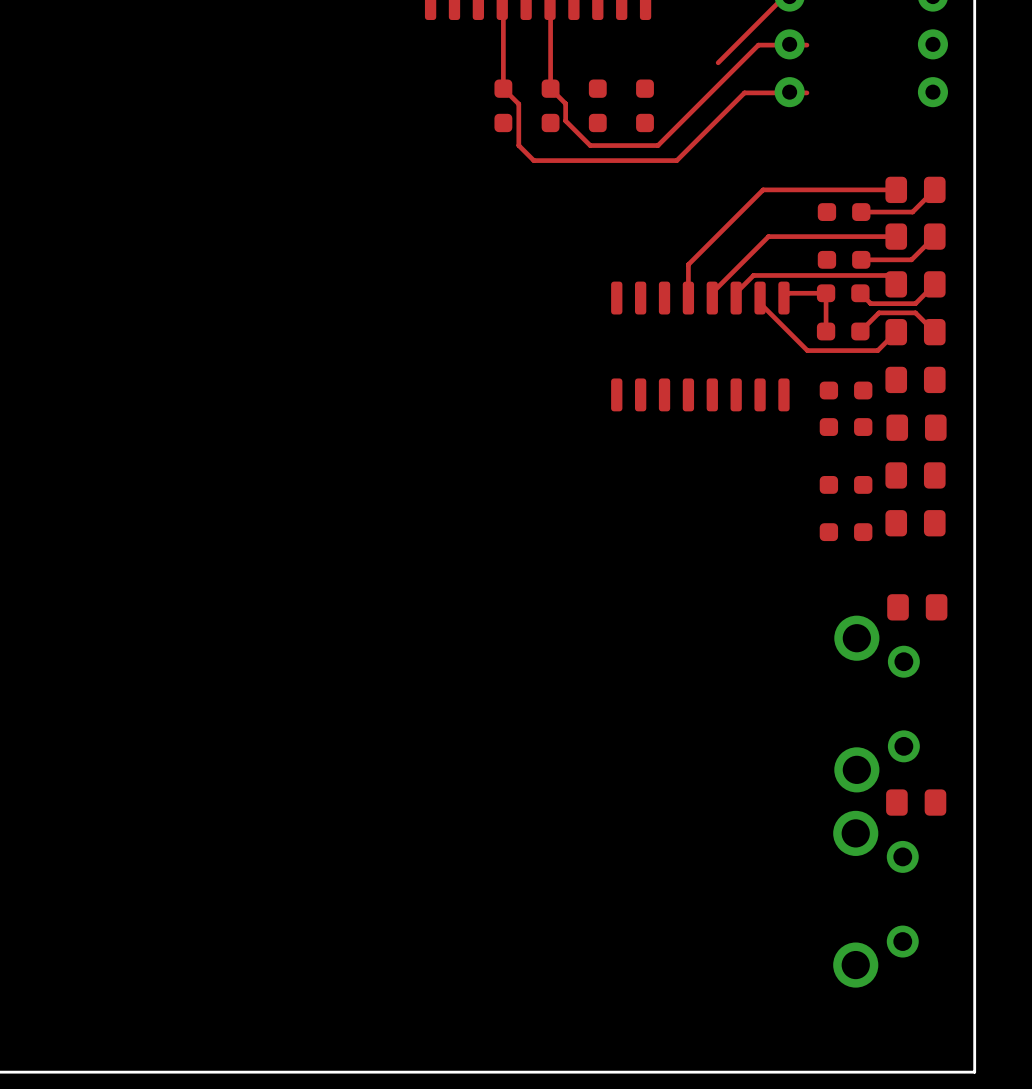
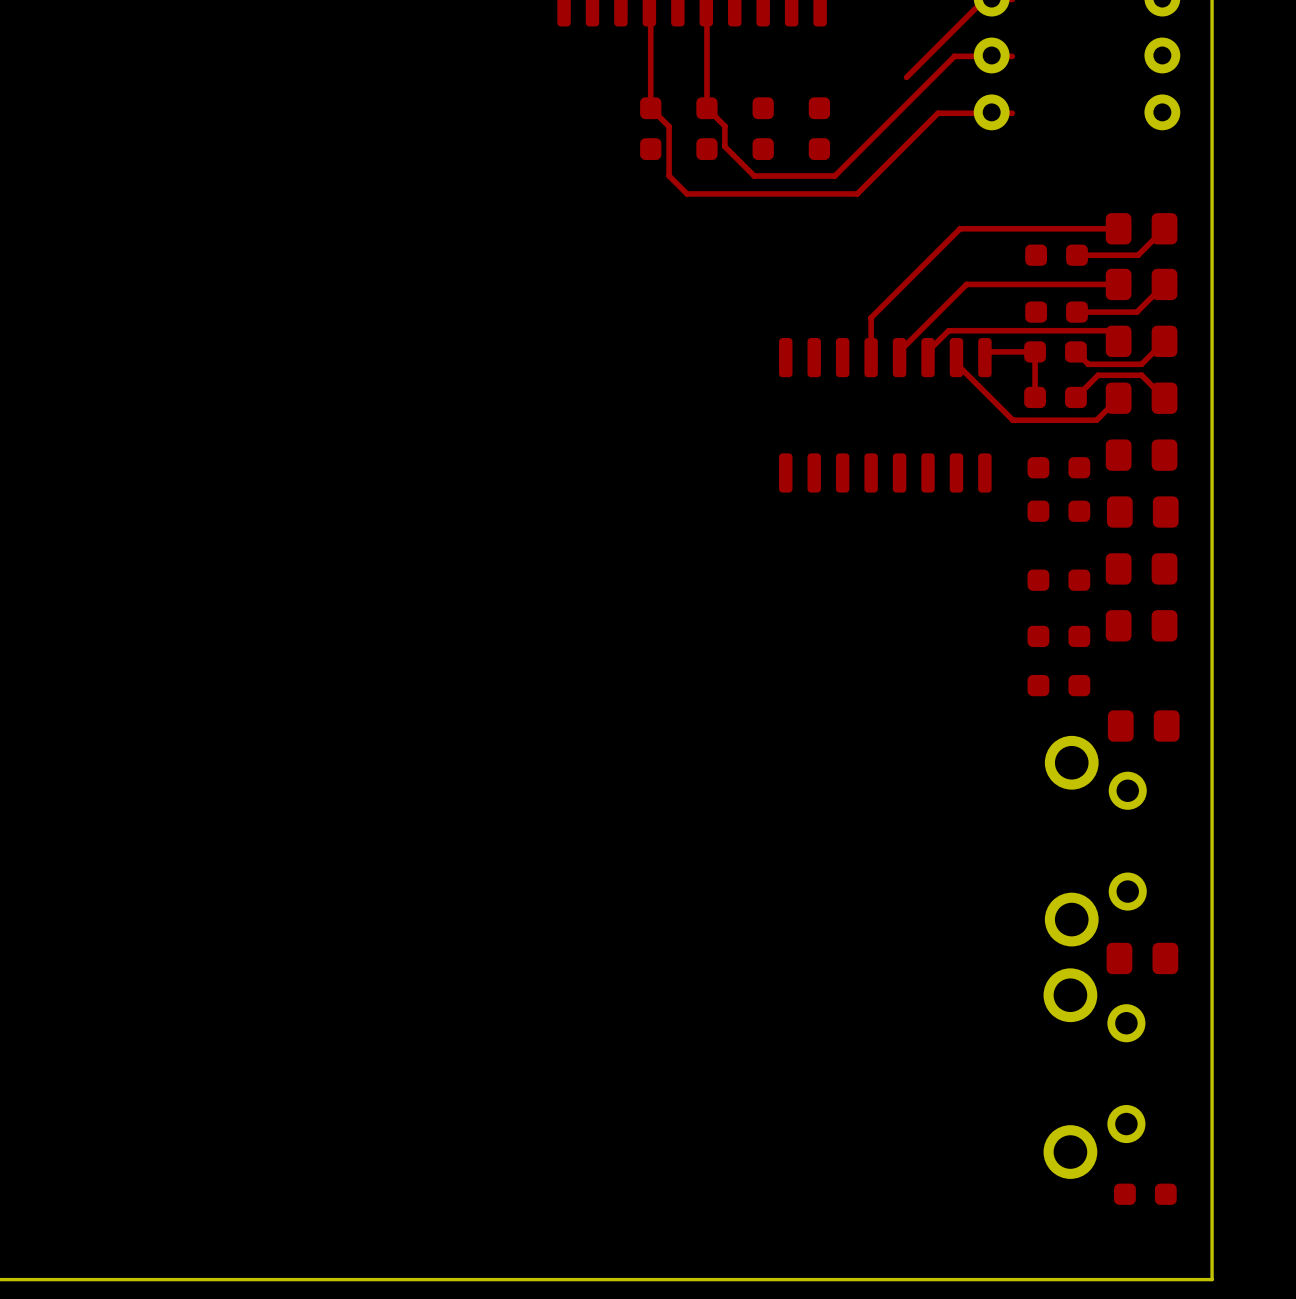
part: none -> (1058, 685)
part: none -> (1145, 1194)

